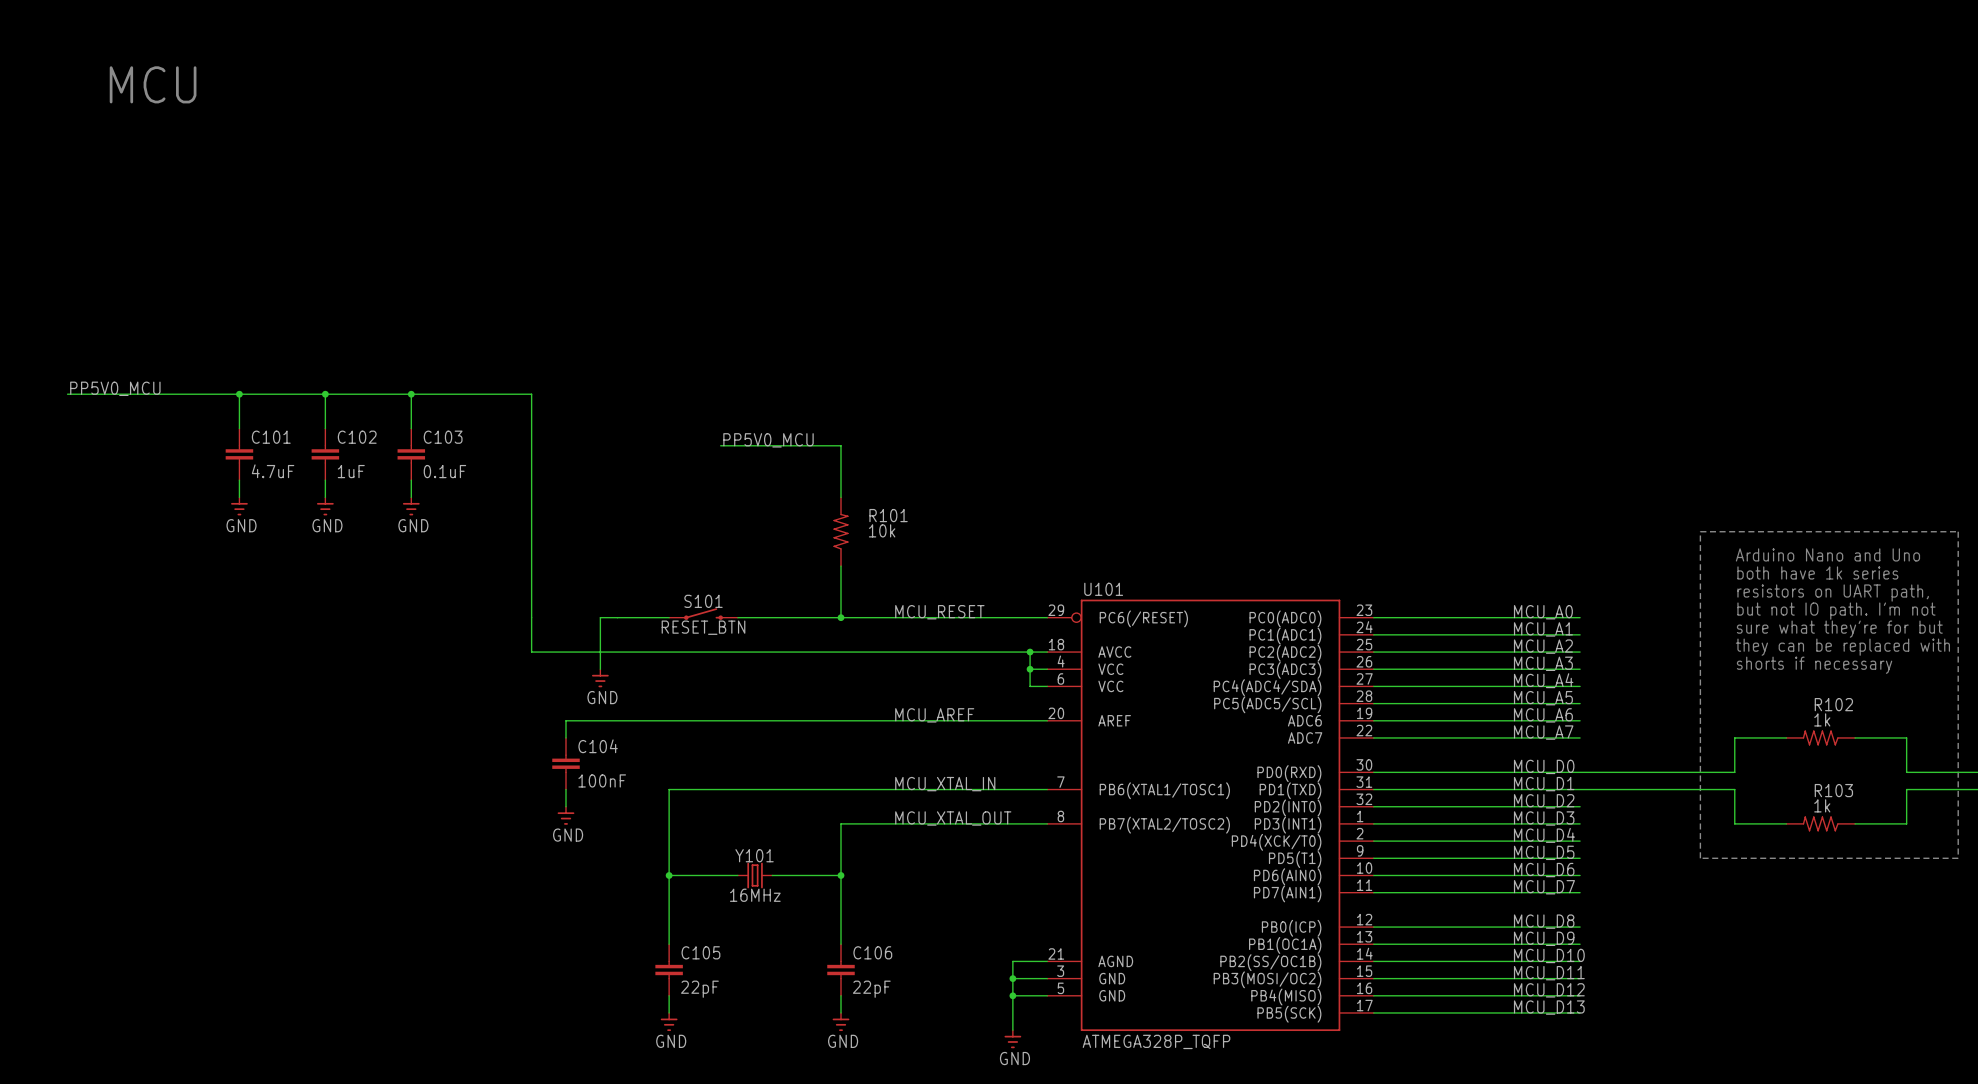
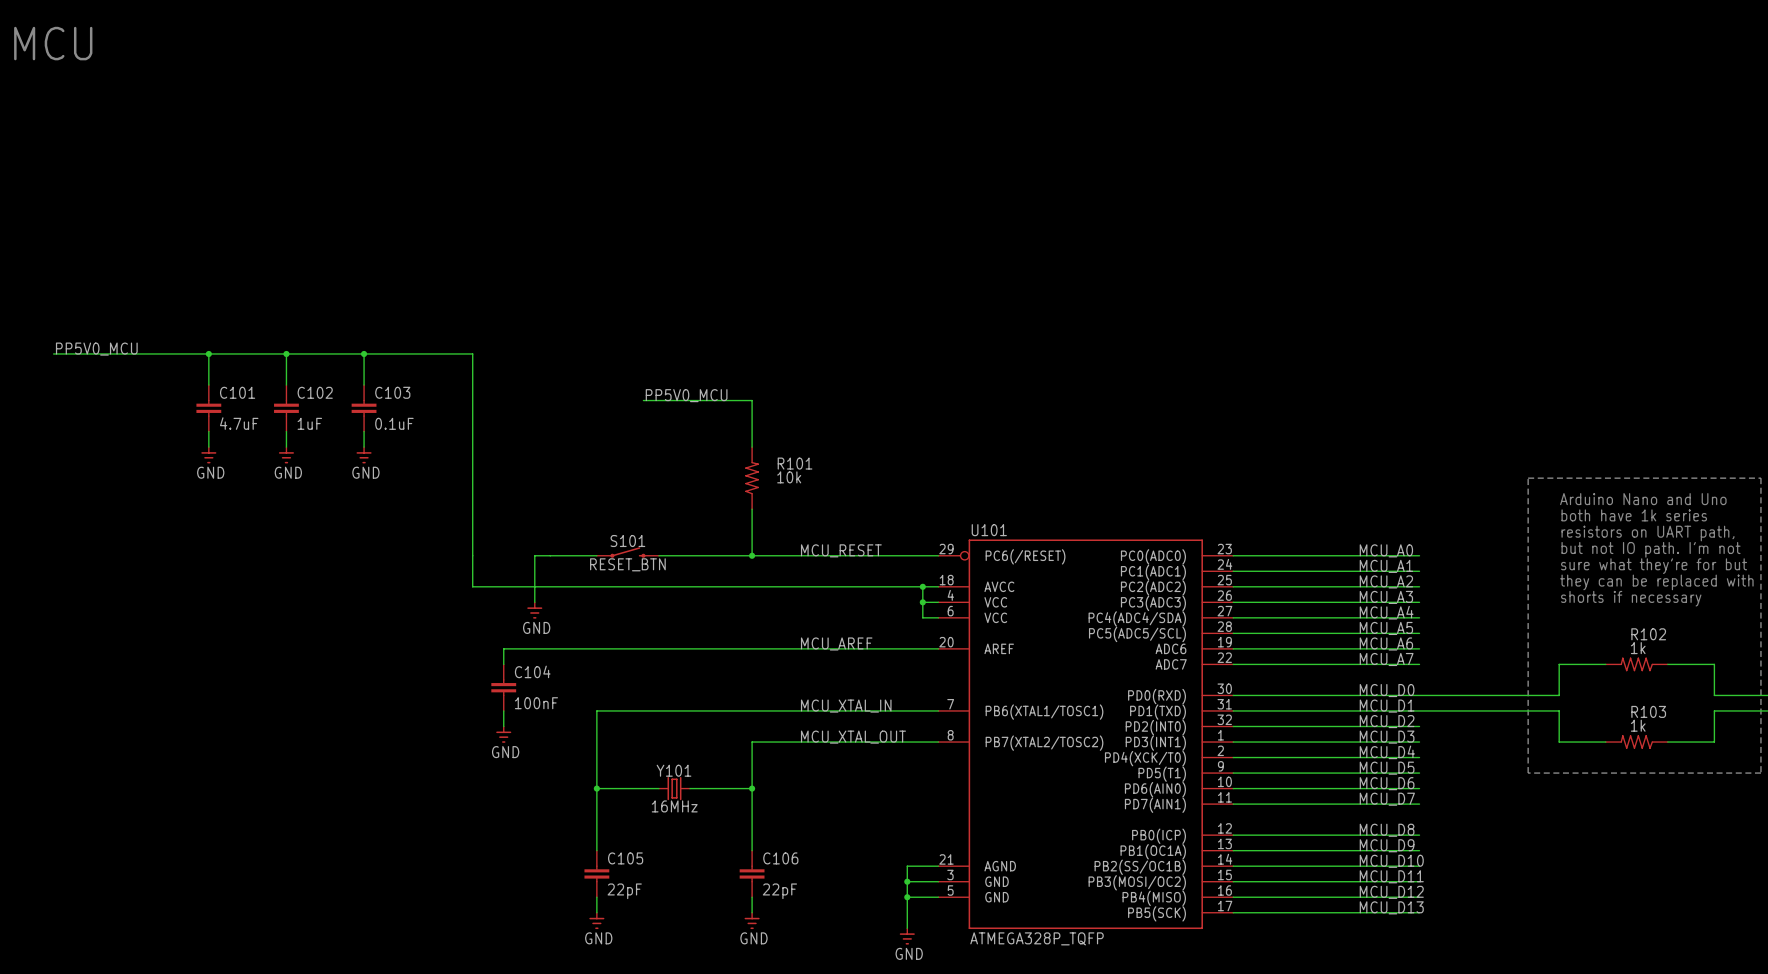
text position: MCU (153, 84) -> MCU (53, 43)

